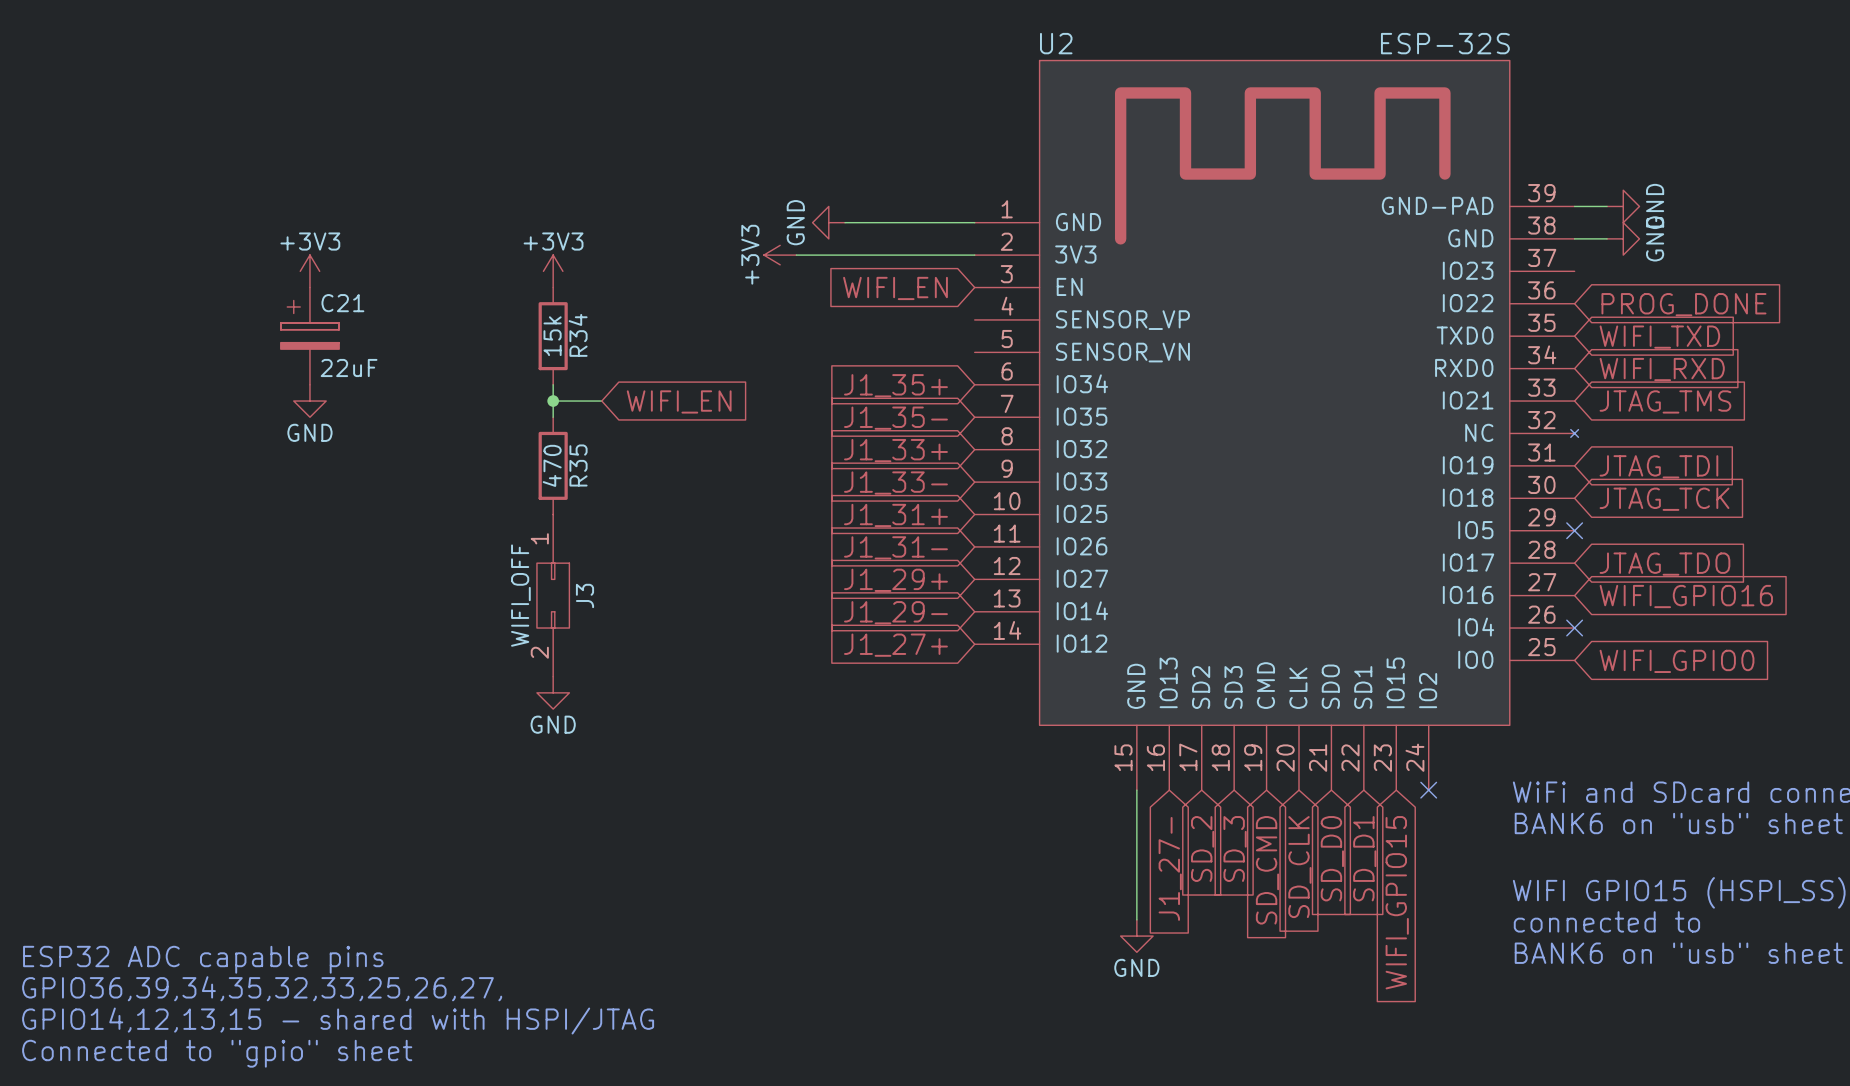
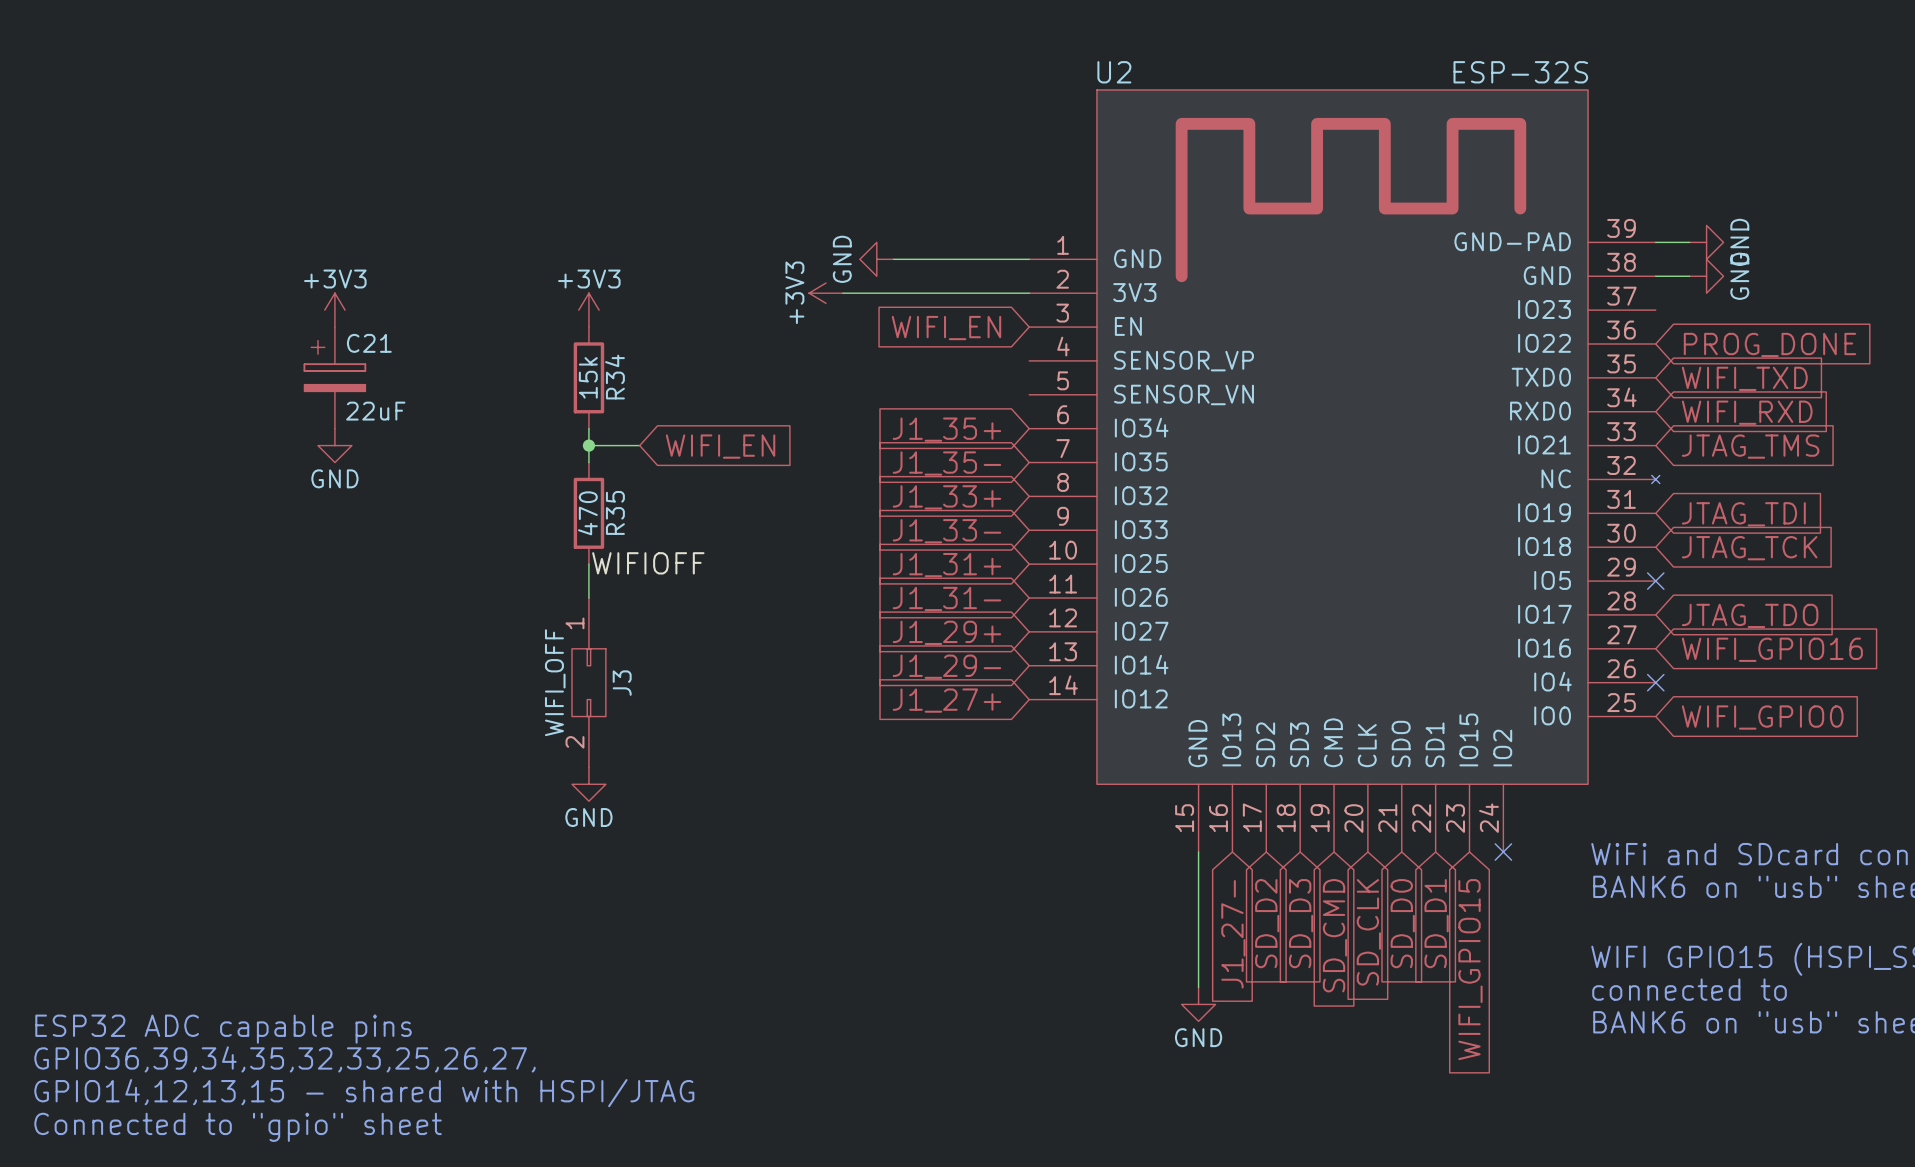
label: none -> WIFIOFF (648, 563)
J3 position: (553, 595) -> (588, 682)
power symbol position: GND (553, 692) -> GND (588, 784)
global label: SD_2 (1202, 848) -> SD_D2 (1267, 923)
global label: SD_3 (1235, 848) -> SD_D3 (1301, 923)

